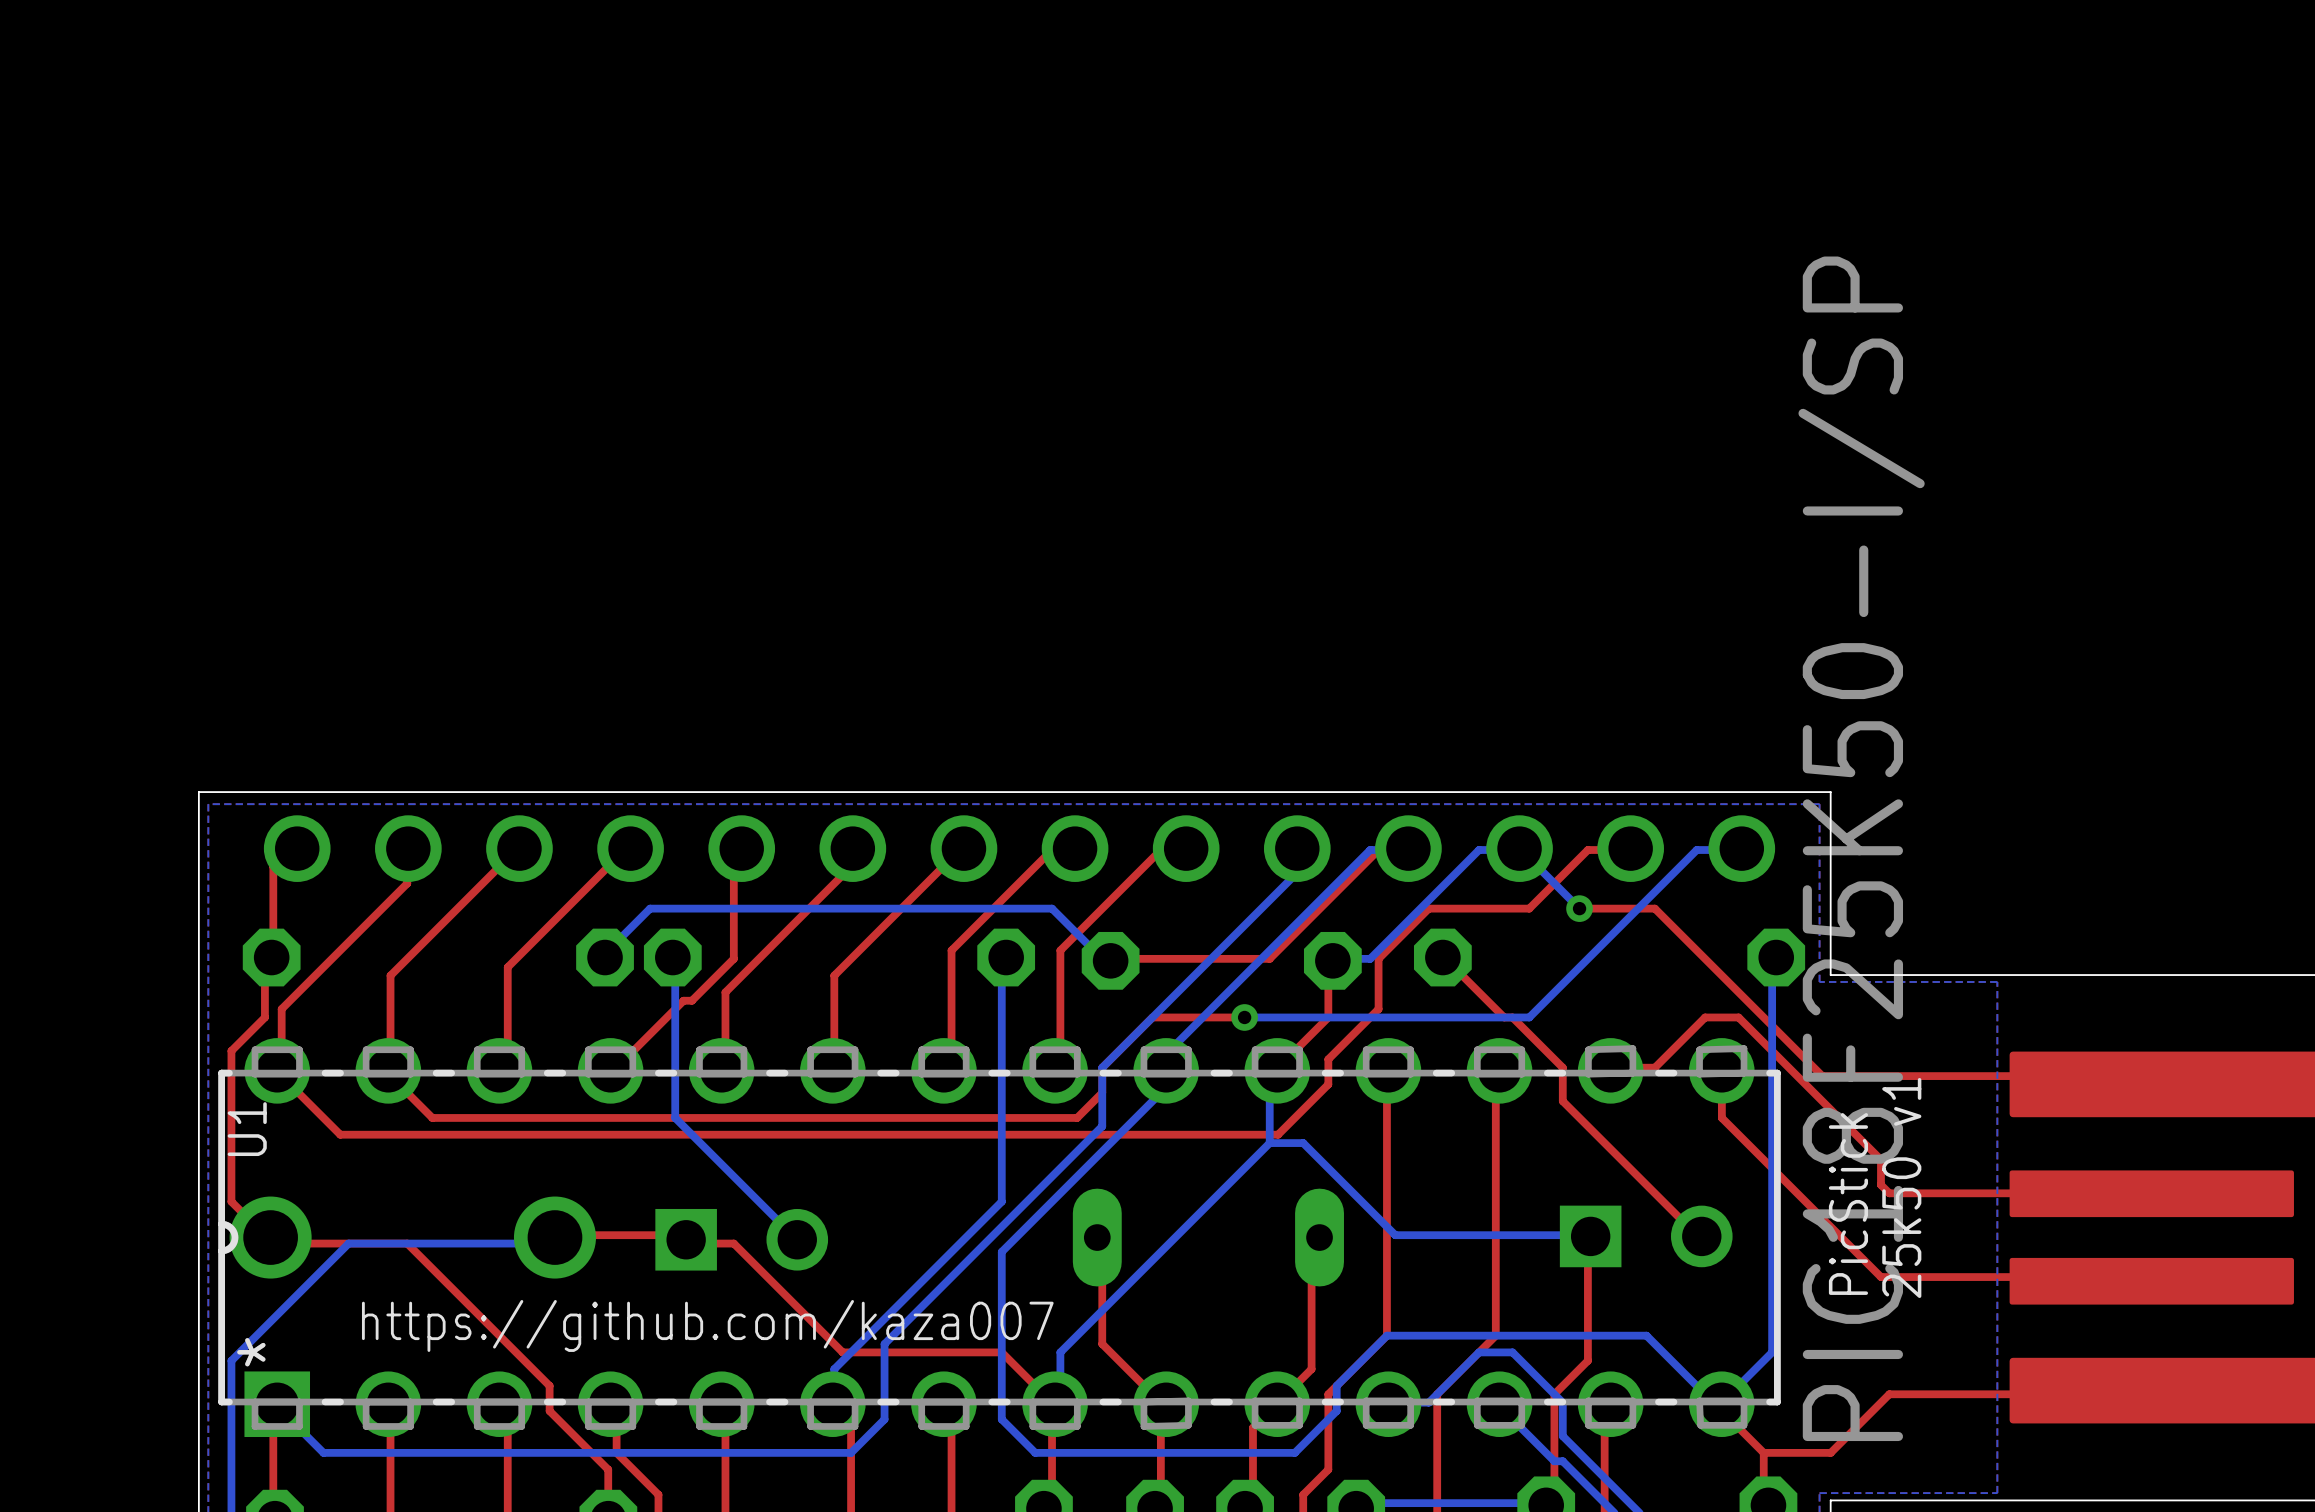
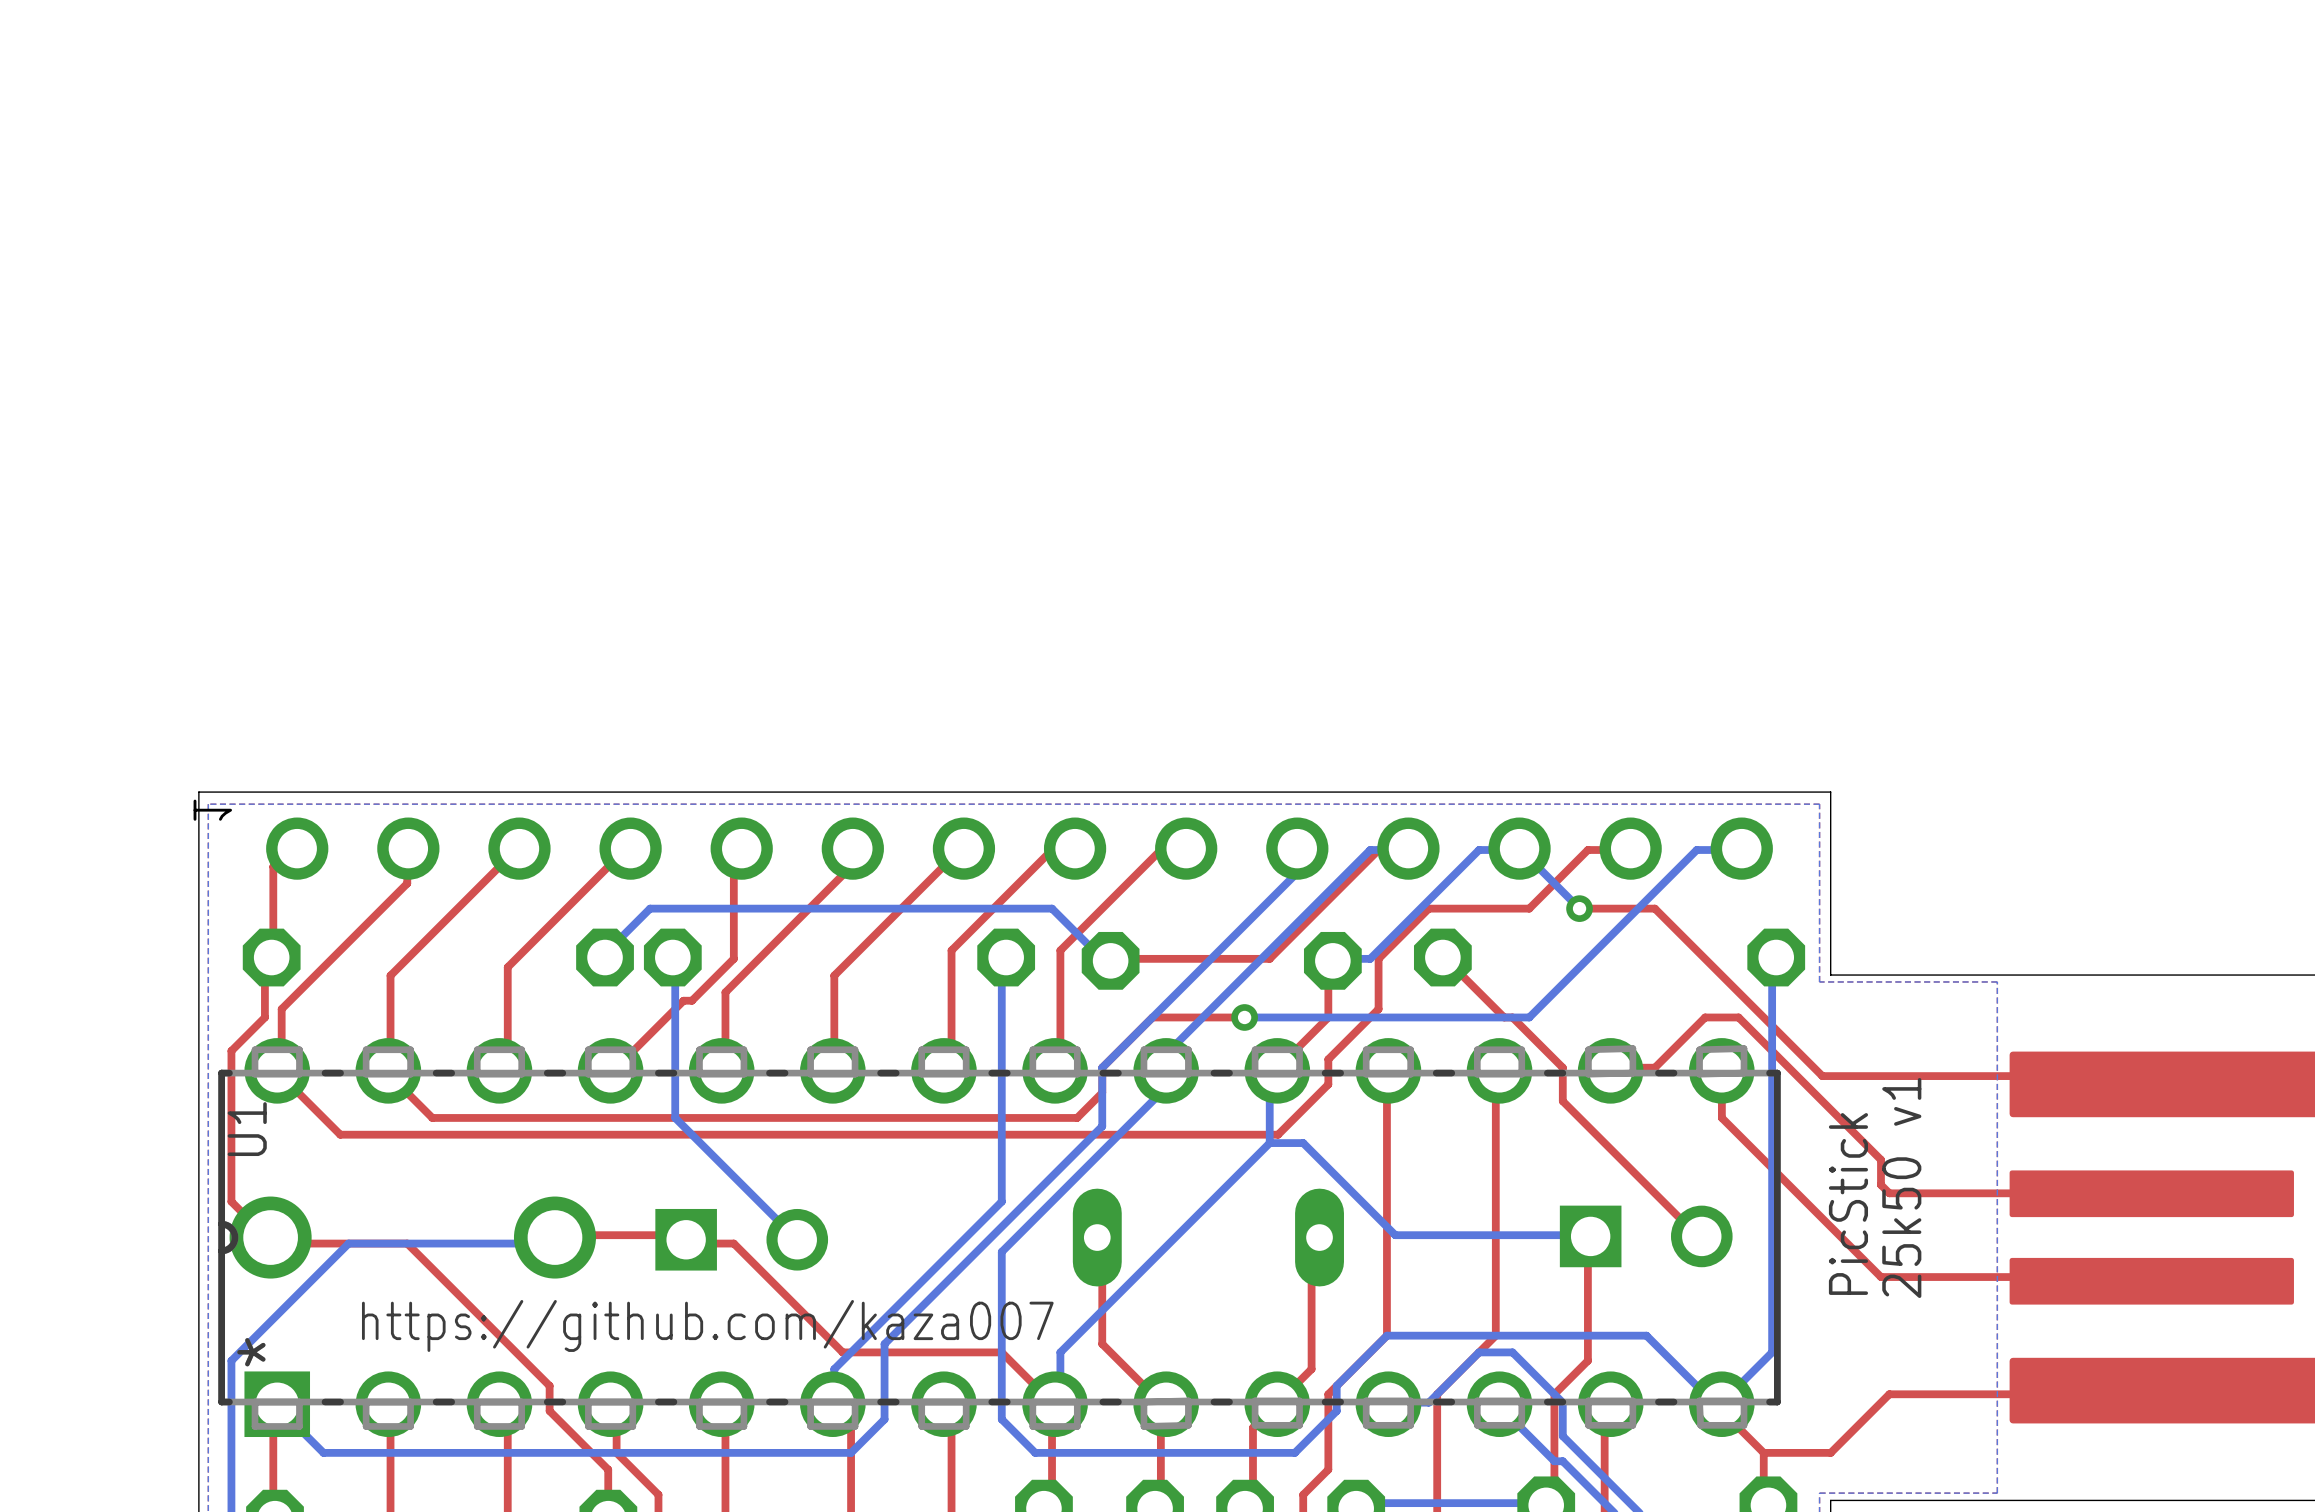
part footprint: [263, 815, 1776, 882] -> [266, 817, 1773, 880]
U1 value: PIC18F25K50-I/SP (1861, 848) -> none

